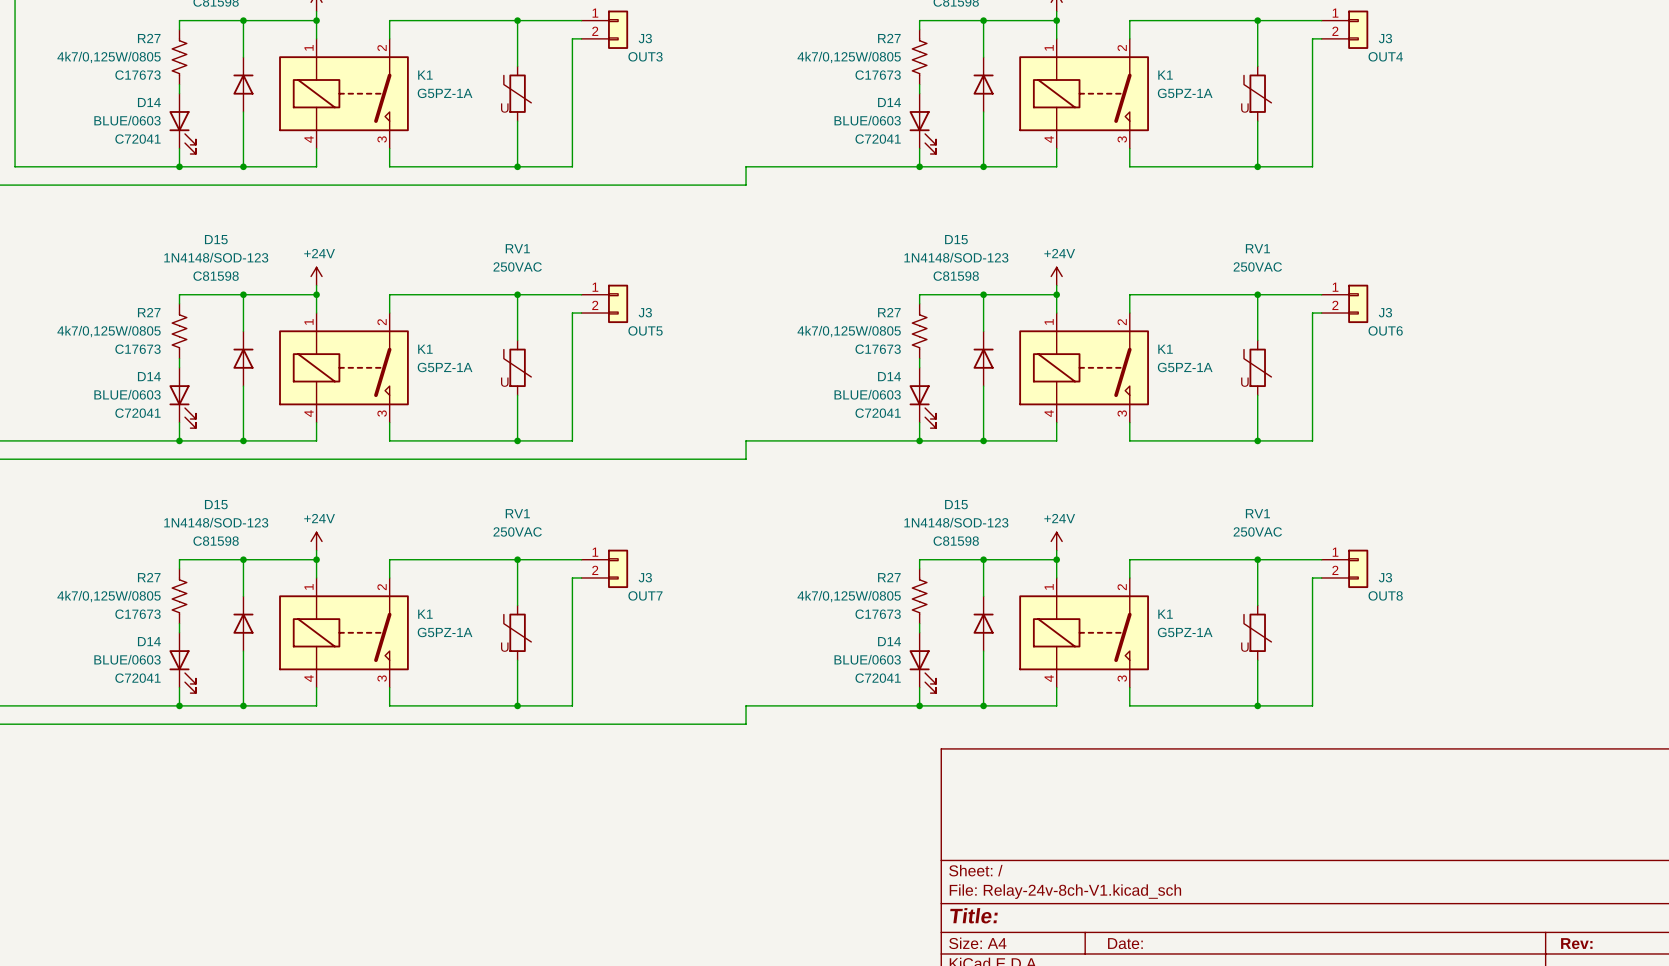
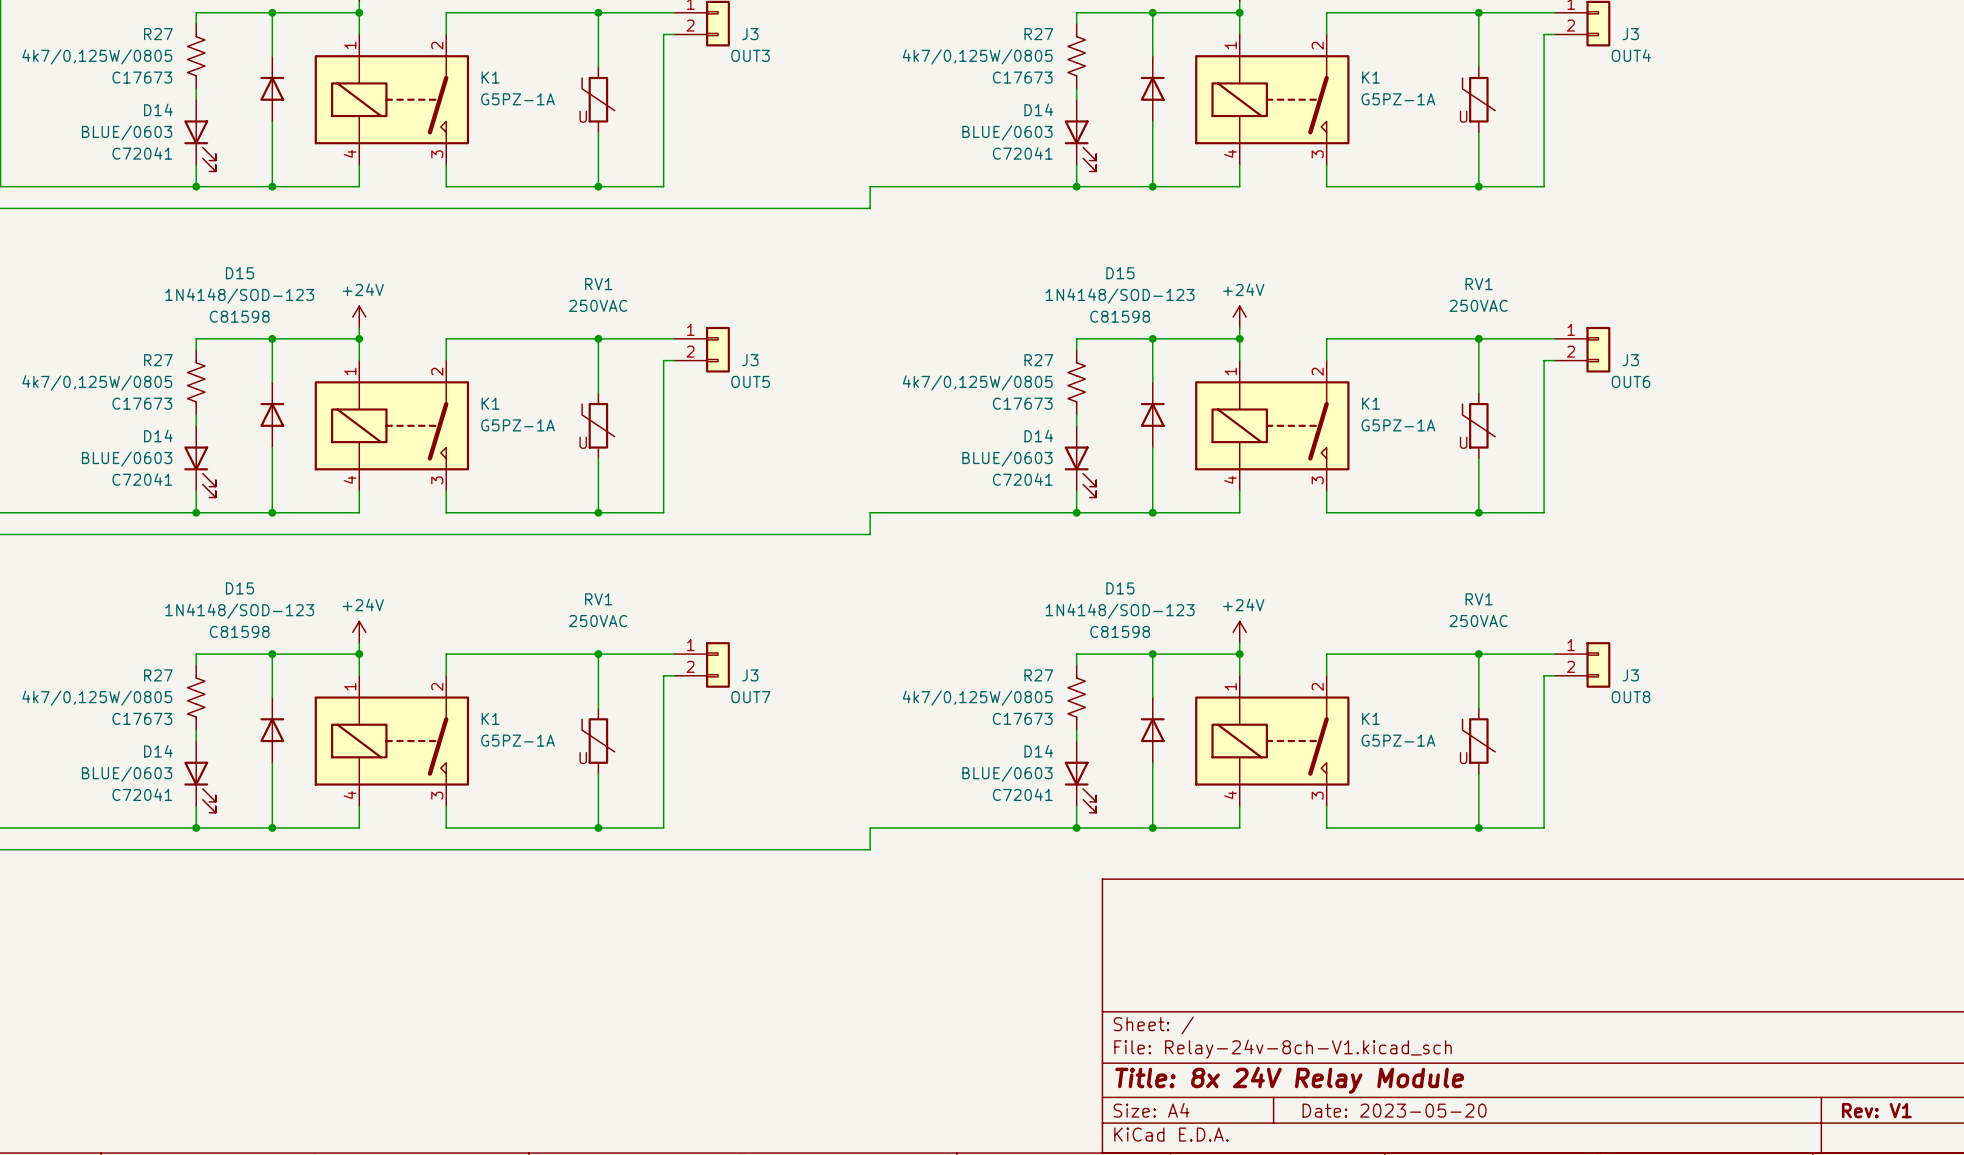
title block: Title: (973, 915) -> Title: 8x 24V Relay Module (1289, 1080)
title block: Date: (1125, 943) -> Date: 2023-05-20 (1394, 1110)
title block: Rev: (1576, 943) -> Rev: V1 (1876, 1110)

